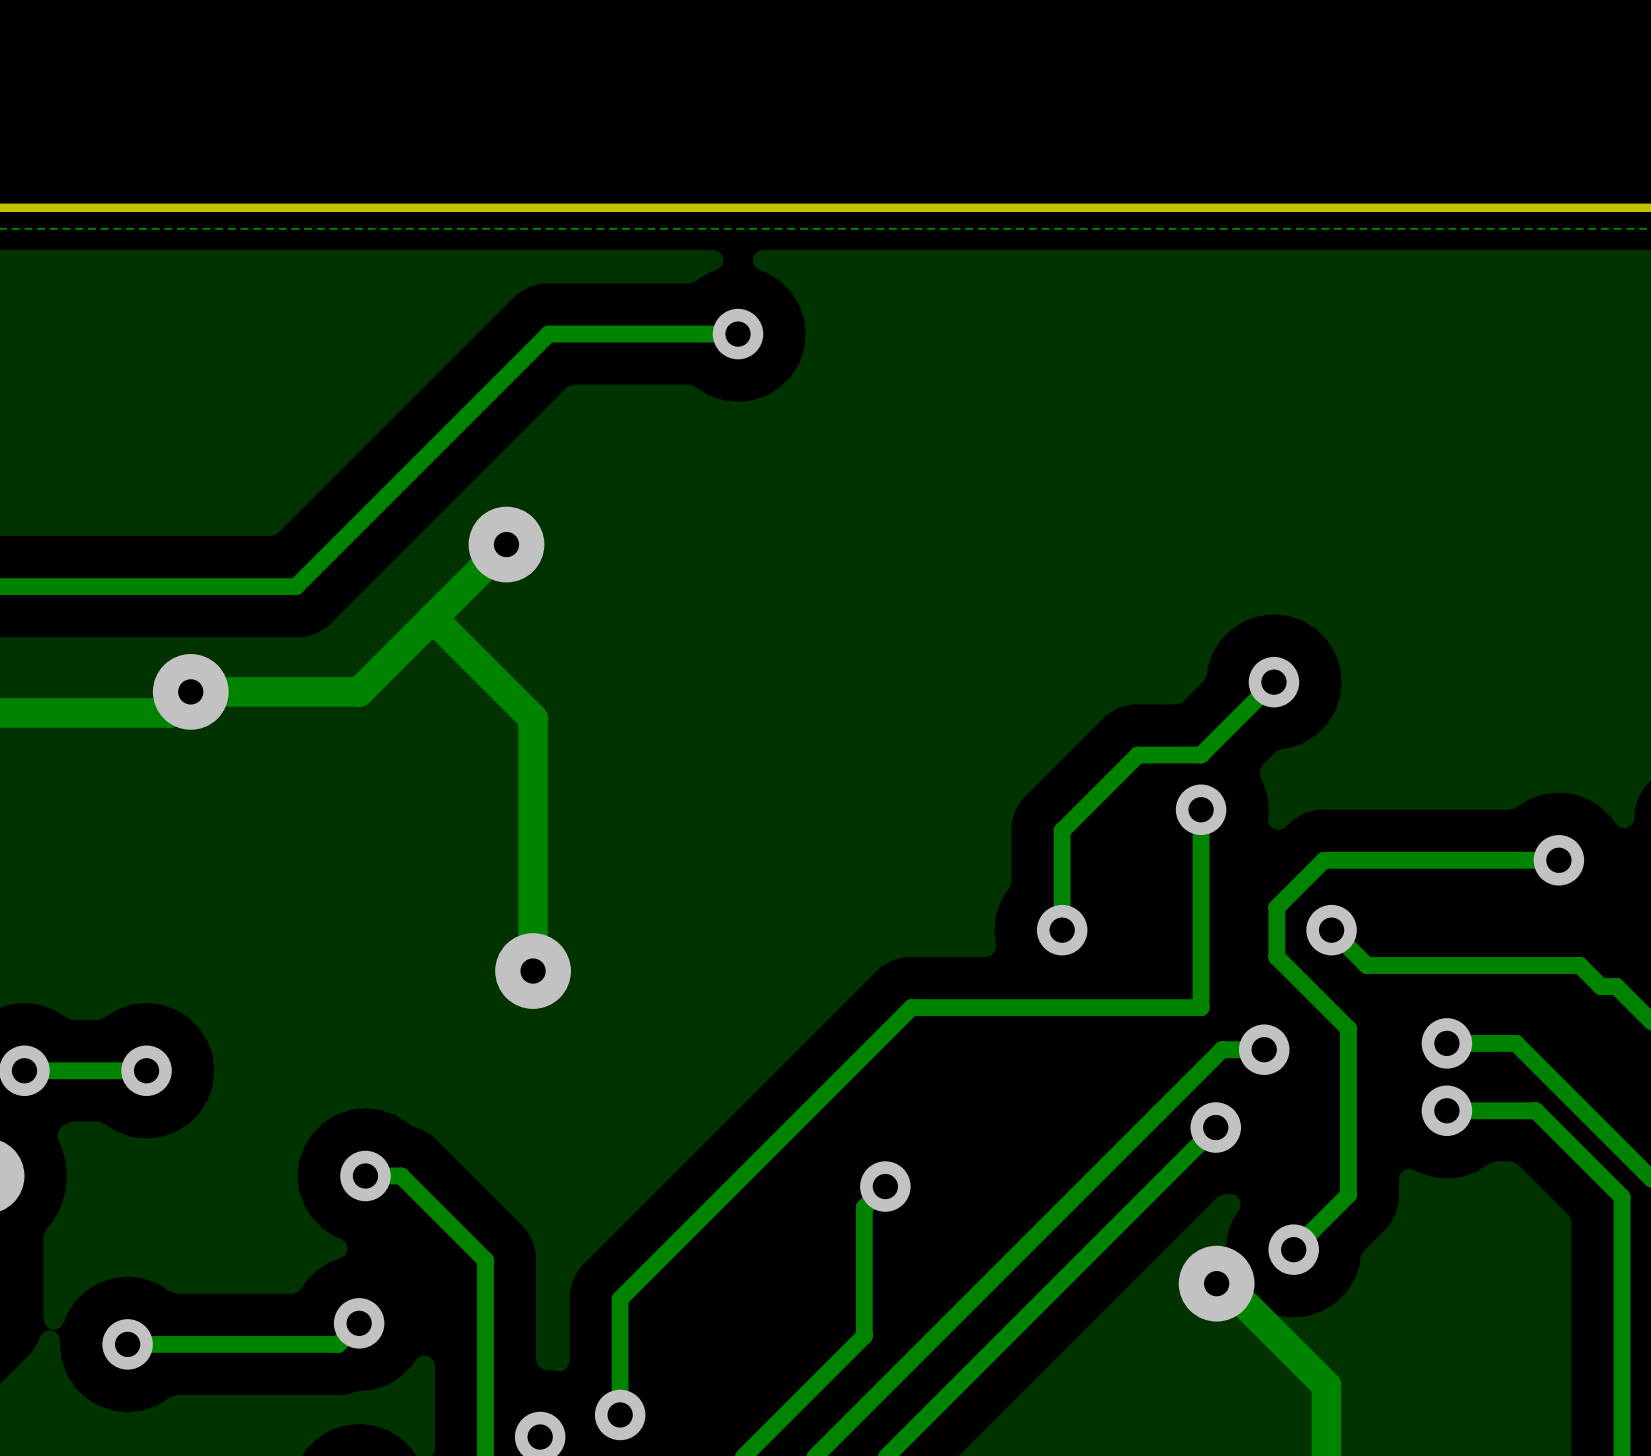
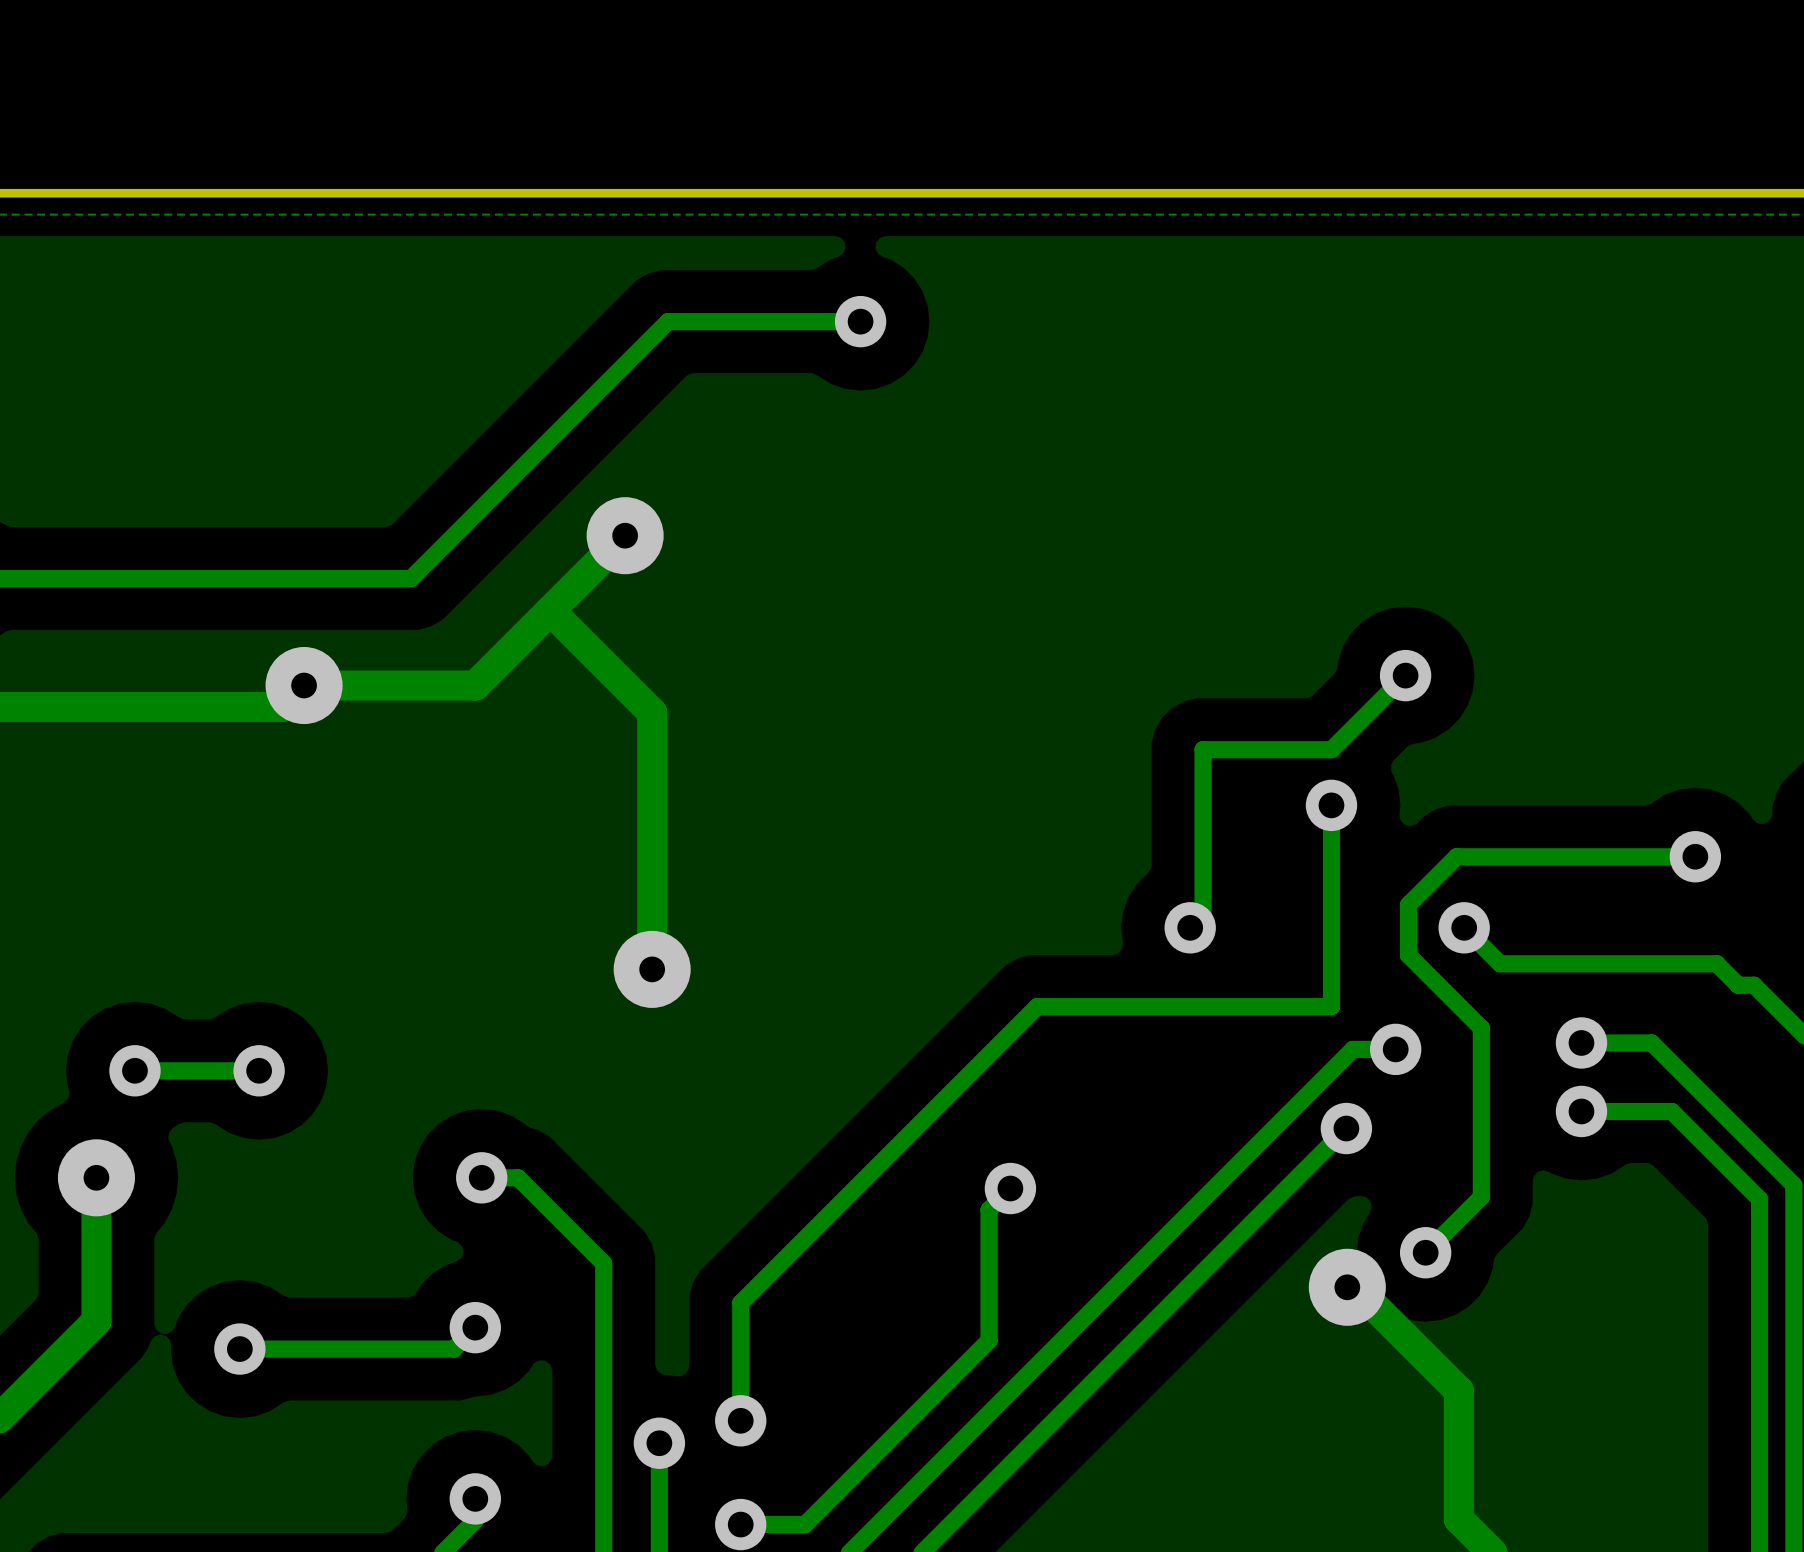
track: (1137, 755) (1062, 830) (1062, 930) -> (1267, 749) (1203, 749) (1203, 914) (1190, 927)

